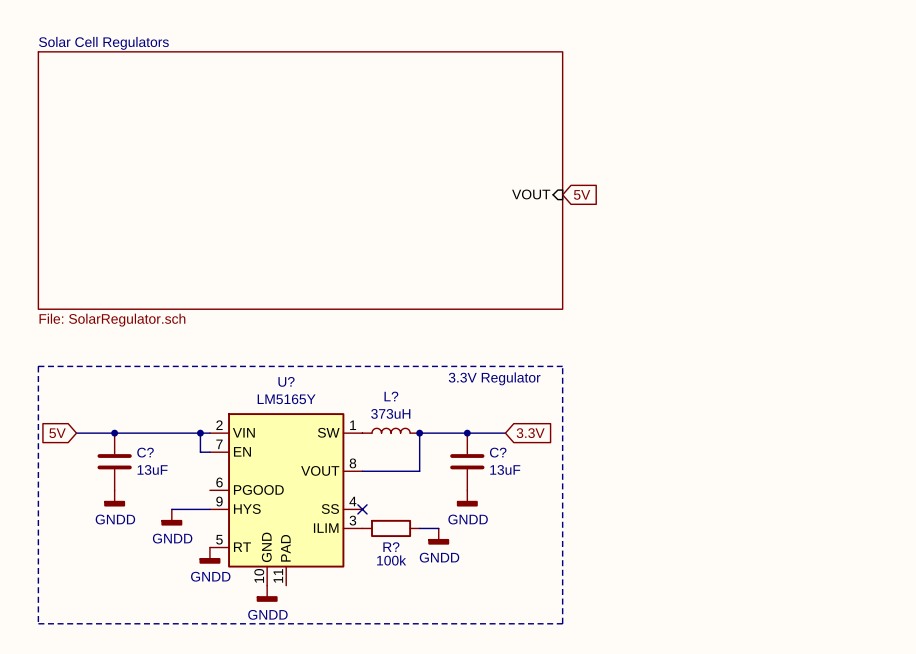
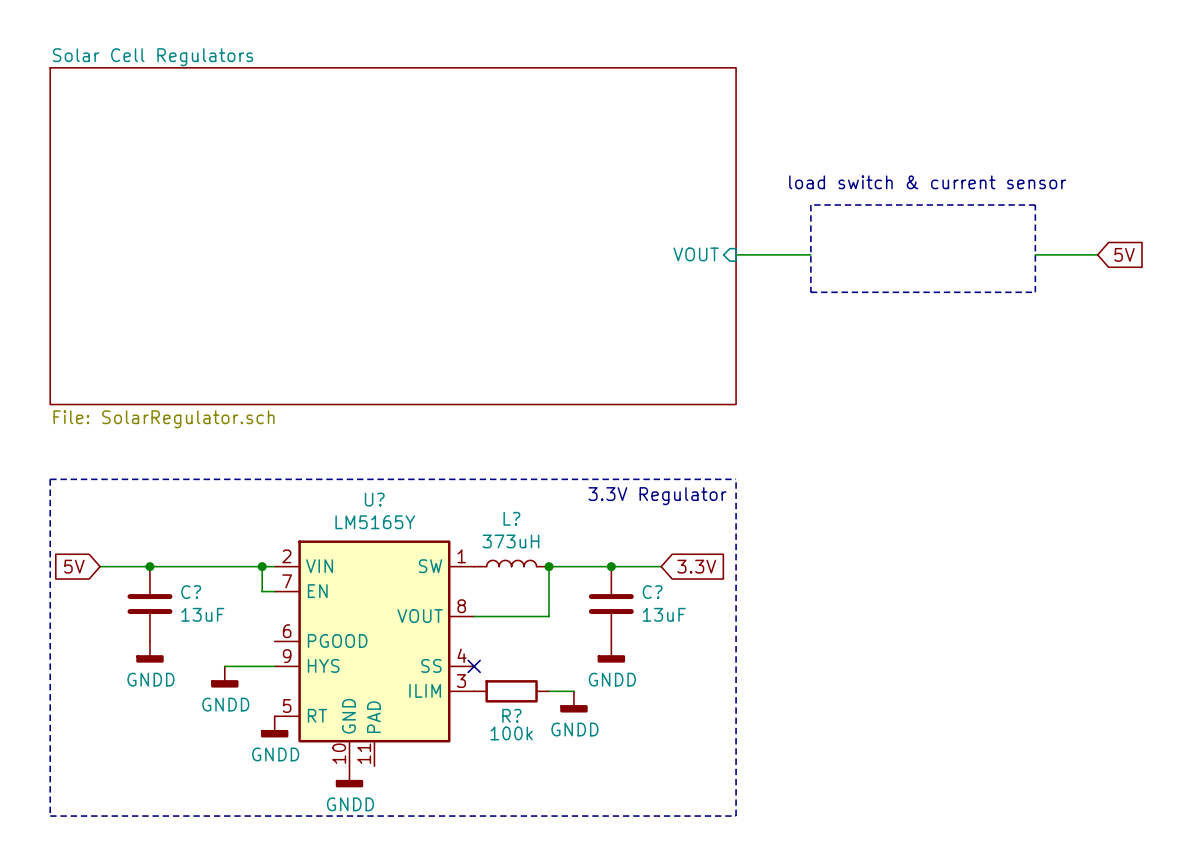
text: none -> load switch & current sensor (927, 182)
line: none -> (810, 205) (810, 292) (1035, 292) (1035, 205) (810, 205)
wire: none -> (736, 254) (810, 254)
global label: 5V (582, 194) -> none
wire: none -> (1035, 254) (1097, 254)
global label: none -> 5V (1124, 254)

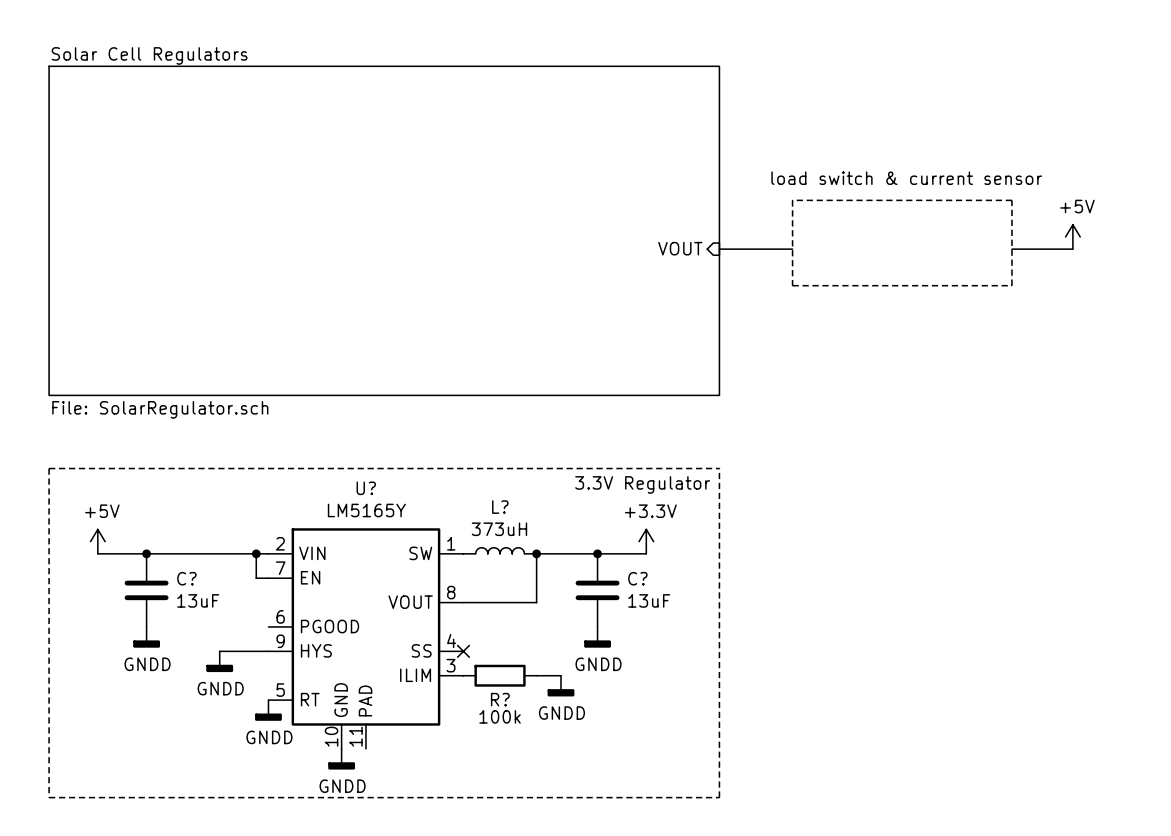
power symbol: none -> +5V (1072, 236)
global label: 5V (1124, 254) -> none
power symbol: none -> +5V (97, 541)
power symbol: none -> +3.3V (646, 541)
global label: 5V (74, 566) -> none
global label: 3.3V (696, 566) -> none

